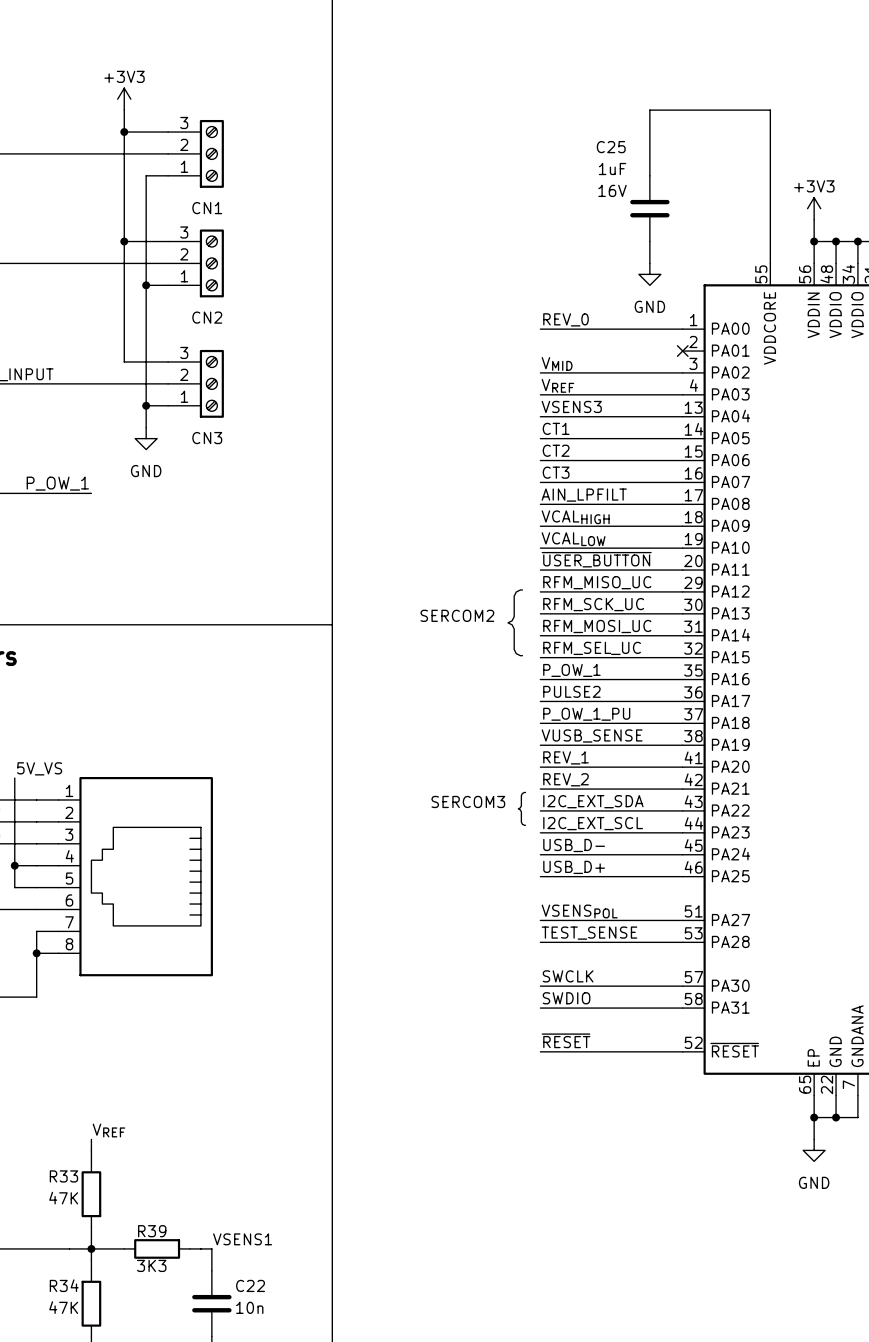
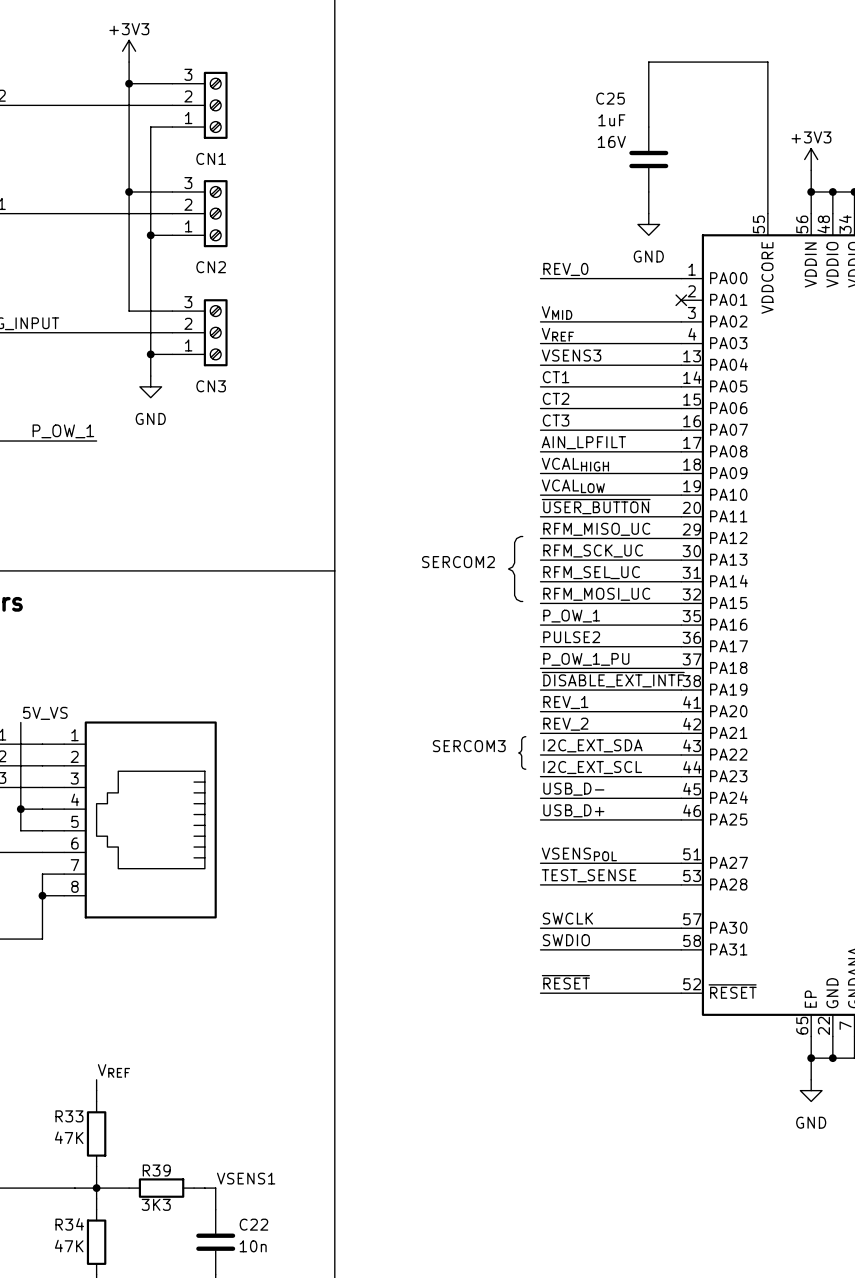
label: RFM_MOSI_UC (597, 626) -> RFM_SEL_UC (591, 572)
label: RFM_SEL_UC (592, 648) -> RFM_MOSI_UC (596, 594)
label: VUSB_SENSE (592, 735) -> ~{DISABLE_EXT_INTF} (613, 679)

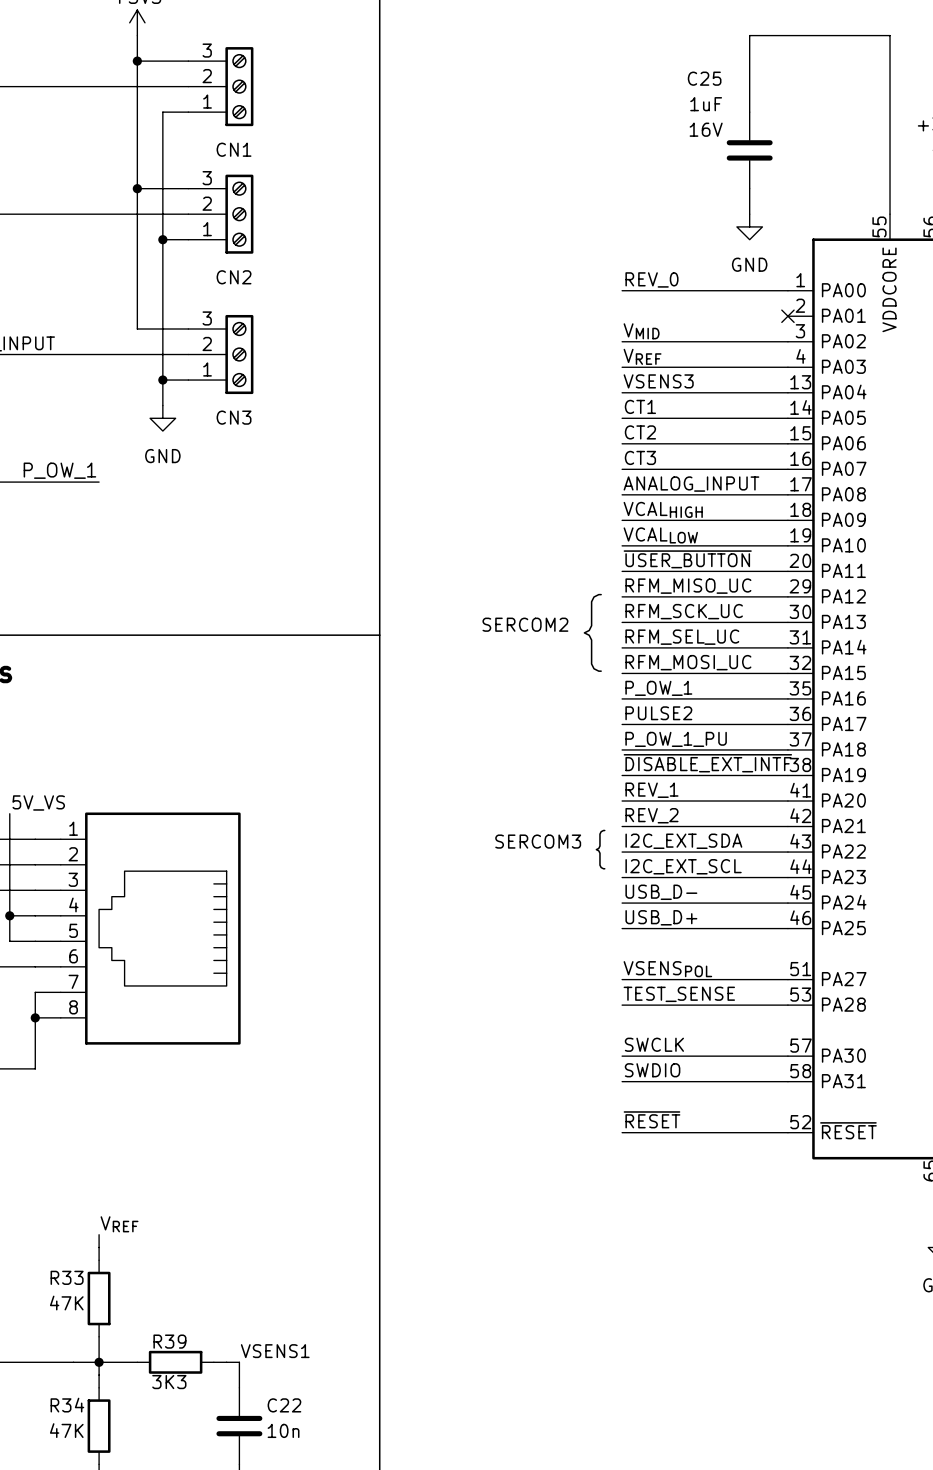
label: AIN_LPFILT (583, 442) -> ANALOG_INPUT (691, 484)

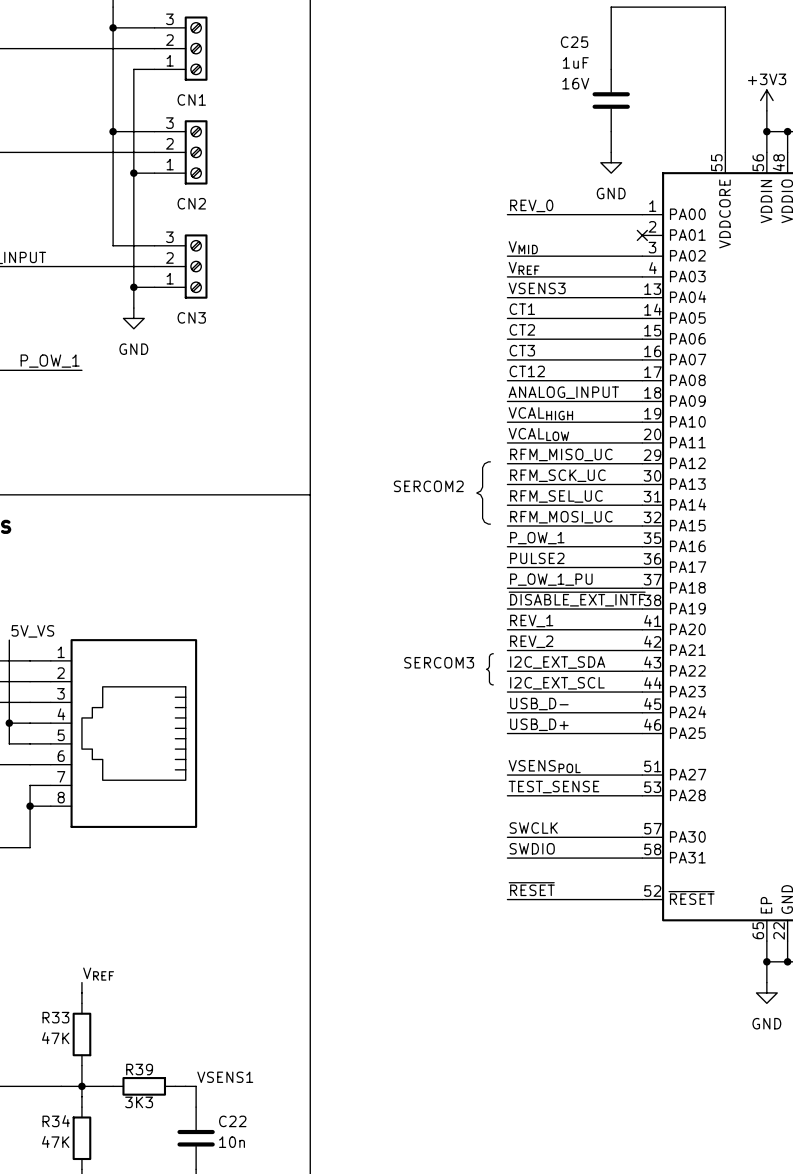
label: ANALOG_INPUT (691, 484) -> CT12 (527, 371)
label: VCALHIGH (663, 509) -> ANALOG_INPUT (563, 392)
label: VCALLOW (660, 535) -> VCALHIGH (540, 413)
label: ~{USER_BUTTON} (687, 559) -> VCALLOW (538, 434)

